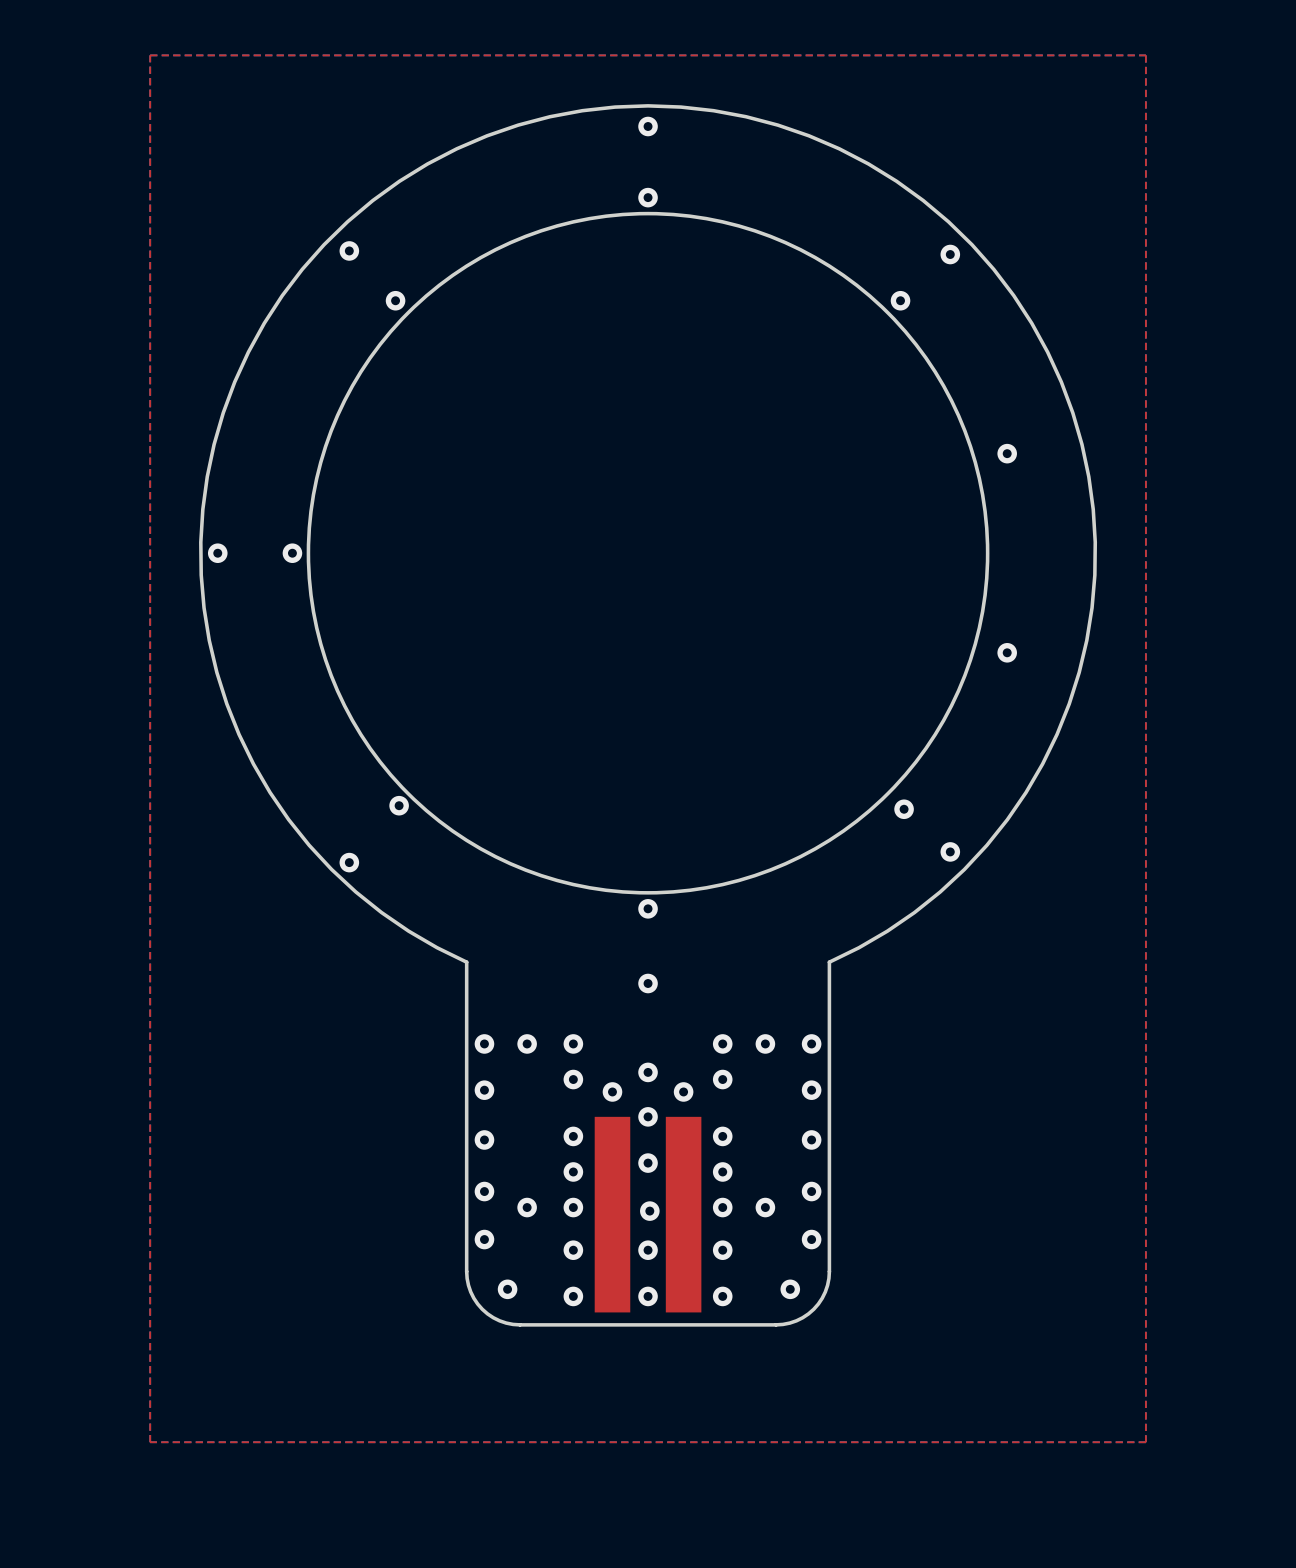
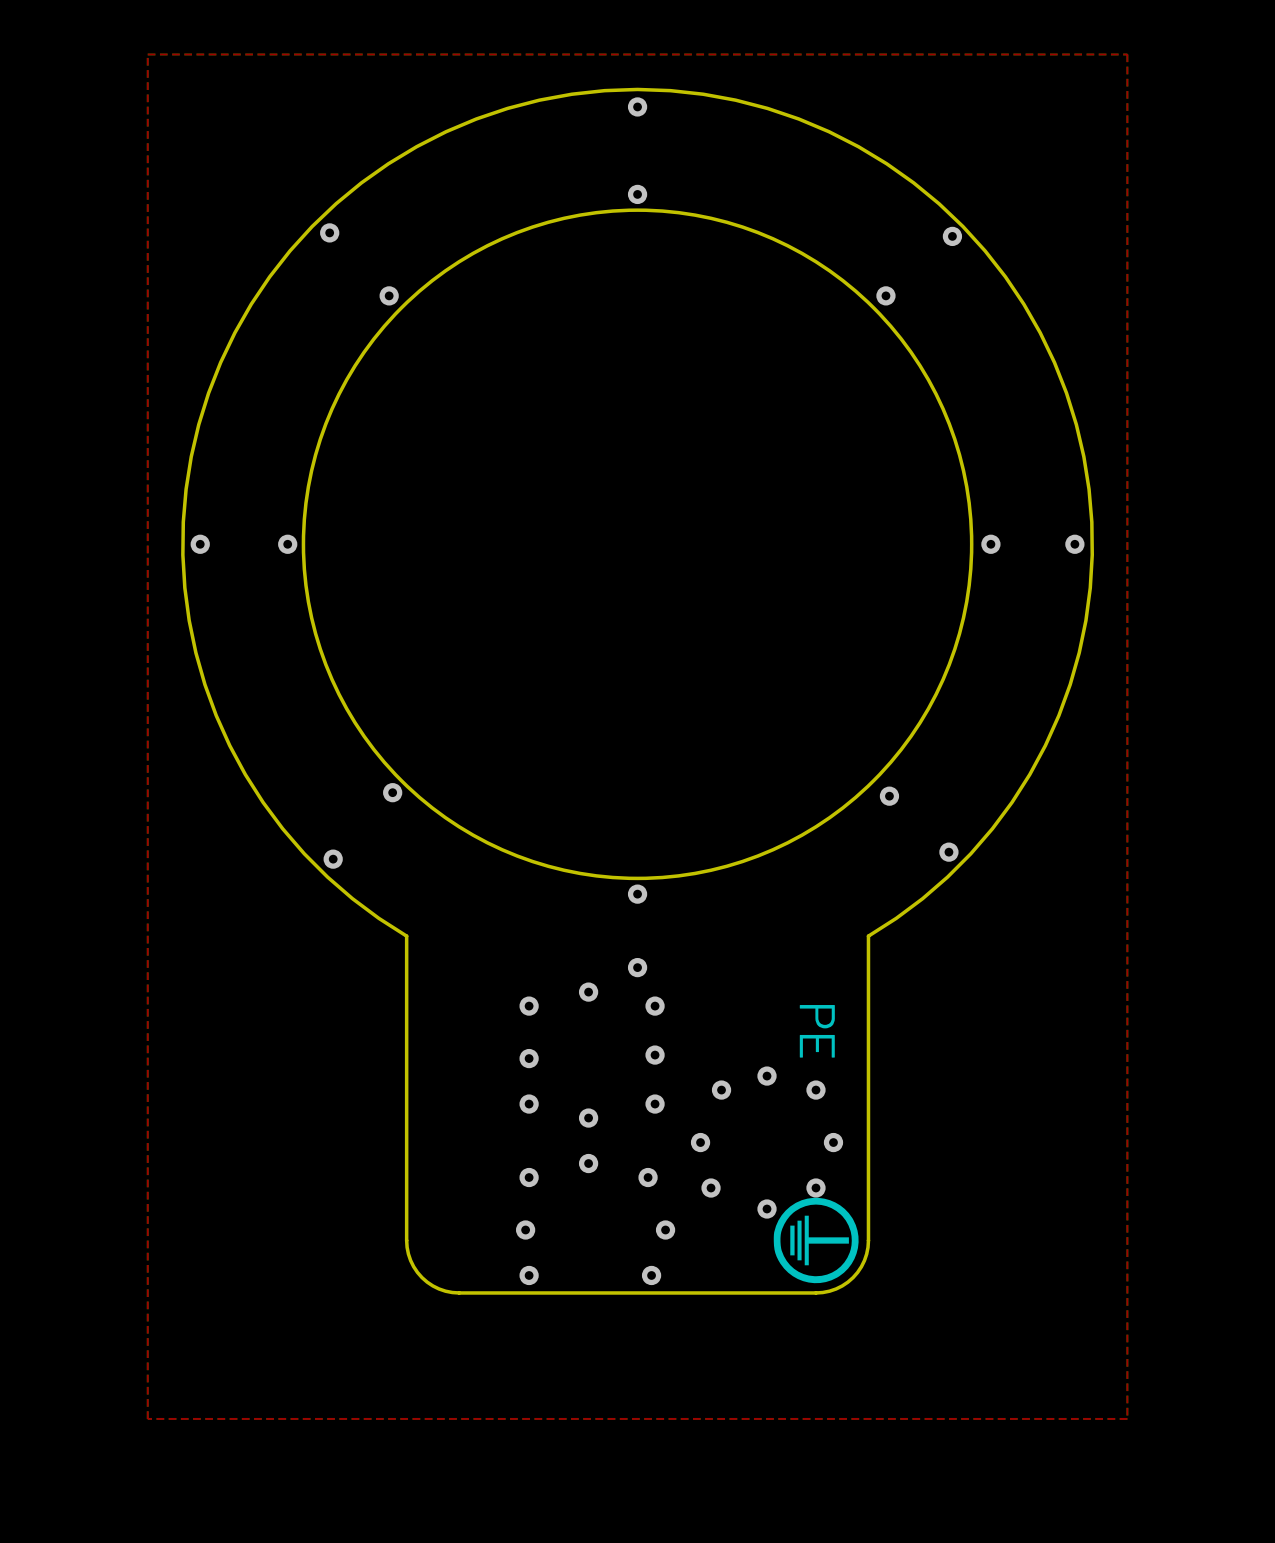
via position: (648, 126) -> (637, 106)
via position: (349, 250) -> (329, 232)
via position: (950, 254) -> (952, 236)
via: (1007, 453) -> none
via position: (217, 553) -> (200, 544)
via: none -> (990, 544)
via: none -> (1074, 544)
via: (1007, 652) -> none
via position: (950, 851) -> (948, 852)
via position: (349, 862) -> (333, 859)
board edge: (466, 962) (466, 1271) (470, 1291) (482, 1309) (499, 1320) (520, 1324) (776, 1324) (796, 1320) (813, 1309) (825, 1291) (829, 1271) (829, 962) (887, 931) (940, 891) (986, 845) (1026, 792) (1057, 734) (1079, 672) (1086, 640) (1094, 575) (1093, 509) (1081, 444) (1061, 381) (1031, 323) (993, 269) (948, 221) (896, 181) (839, 148) (777, 125) (746, 116) (680, 107) (648, 105) (582, 110) (518, 125) (456, 148) (399, 181) (372, 200) (324, 244) (302, 269) (264, 323) (248, 352) (234, 381) (214, 444) (207, 476) (200, 542) (204, 607) (216, 672) (226, 703) (239, 734) (270, 792) (288, 819) (331, 869) (381, 912) (437, 947) (466, 962) -> (406, 936) (352, 898) (327, 877) (304, 853) (263, 802) (229, 745) (204, 684) (195, 652) (189, 620) (182, 555) (186, 489) (198, 424) (208, 393) (220, 362) (251, 304) (290, 250) (336, 203) (361, 182) (416, 146) (445, 131) (507, 108) (571, 94) (637, 89) (670, 90) (703, 94) (767, 108) (829, 131) (858, 146) (913, 182) (962, 226) (1005, 276) (1040, 332) (1054, 362) (1076, 424) (1089, 489) (1092, 555) (1085, 620) (1070, 684) (1045, 745) (1029, 774) (992, 828) (947, 877) (896, 918) (868, 936) (868, 1240) (866, 1254) (857, 1272) (847, 1282) (836, 1288) (815, 1292) (459, 1292) (445, 1291) (427, 1282) (417, 1272) (410, 1260) (406, 1240) (406, 936)
via: none -> (588, 992)
via: none -> (529, 1006)
via: none -> (655, 1006)
via: (484, 1043) -> none
via: (527, 1043) -> none
via: (573, 1043) -> none
via: (722, 1043) -> none
via: (765, 1043) -> none
via: (811, 1043) -> none
text: none -> PE (817, 1031)
via: (648, 1072) -> none
via: none -> (655, 1055)
via: none -> (529, 1058)
via: (573, 1079) -> none
via: (722, 1079) -> none
via: (484, 1090) -> none
via position: (811, 1090) -> (815, 1090)
via: (612, 1091) -> none
via: (683, 1091) -> none
via: none -> (767, 1076)
via: none -> (721, 1090)
via position: (648, 1116) -> (655, 1104)
via: none -> (529, 1104)
via: (573, 1136) -> none
via: none -> (588, 1118)
via: (722, 1136) -> none
via: (484, 1139) -> none
via: (811, 1139) -> none
via: none -> (833, 1142)
via: (648, 1163) -> none
via: (573, 1171) -> none
via position: (722, 1171) -> (700, 1142)
via: none -> (588, 1163)
via: (484, 1191) -> none
via position: (811, 1191) -> (815, 1188)
via position: (527, 1207) -> (529, 1177)
via: (573, 1207) -> none
via: (765, 1207) -> none
via position: (649, 1211) -> (648, 1177)
part: (648, 1214) -> none
drawing: none -> [773, 1197, 859, 1284]
via: none -> (767, 1209)
via: (484, 1239) -> none
via: (811, 1239) -> none
via: none -> (525, 1230)
via: (573, 1250) -> none
via: (648, 1250) -> none
via: none -> (665, 1230)
via: (722, 1250) -> none
via: (507, 1289) -> none
via: (790, 1289) -> none
via: none -> (529, 1275)
via: (573, 1296) -> none
via position: (648, 1296) -> (651, 1275)
via: (722, 1296) -> none

